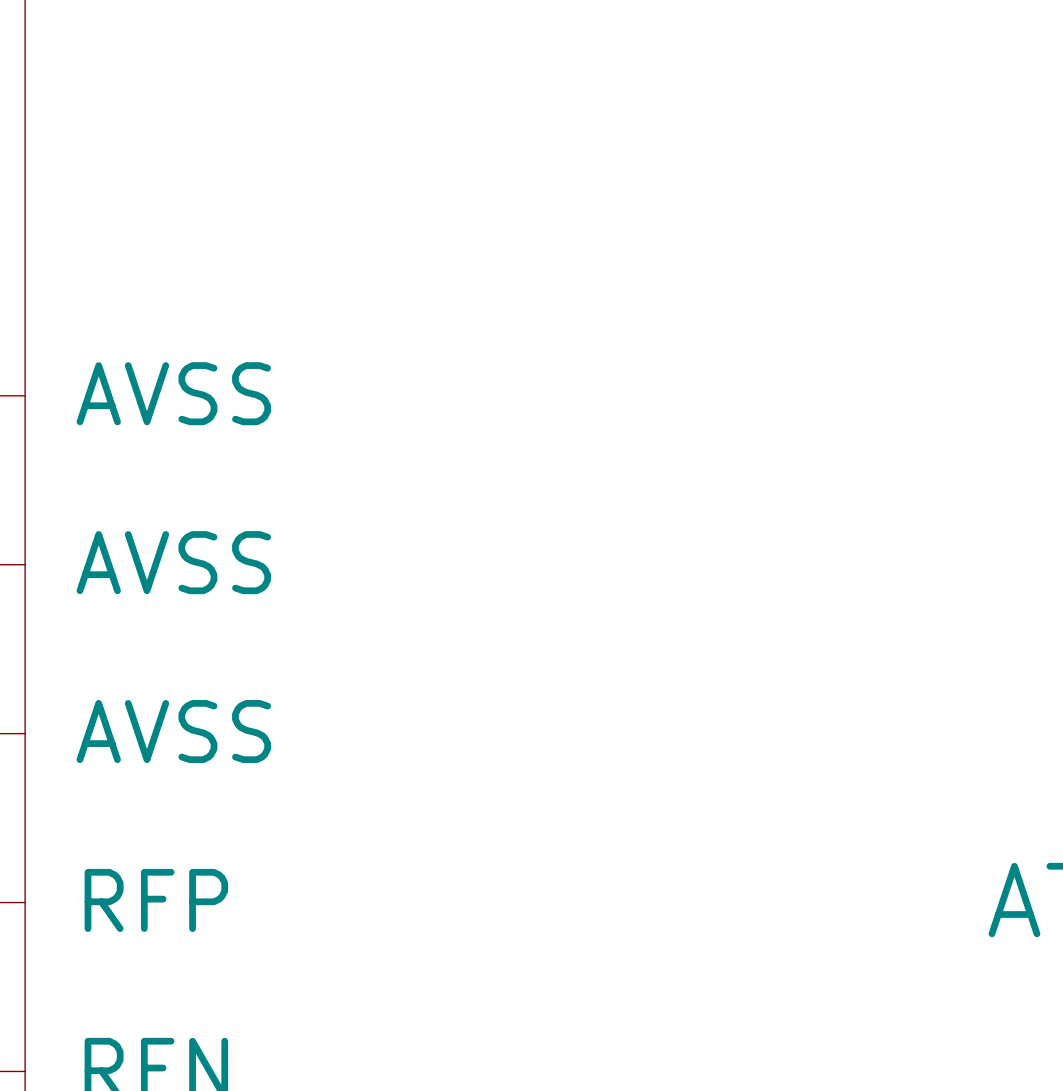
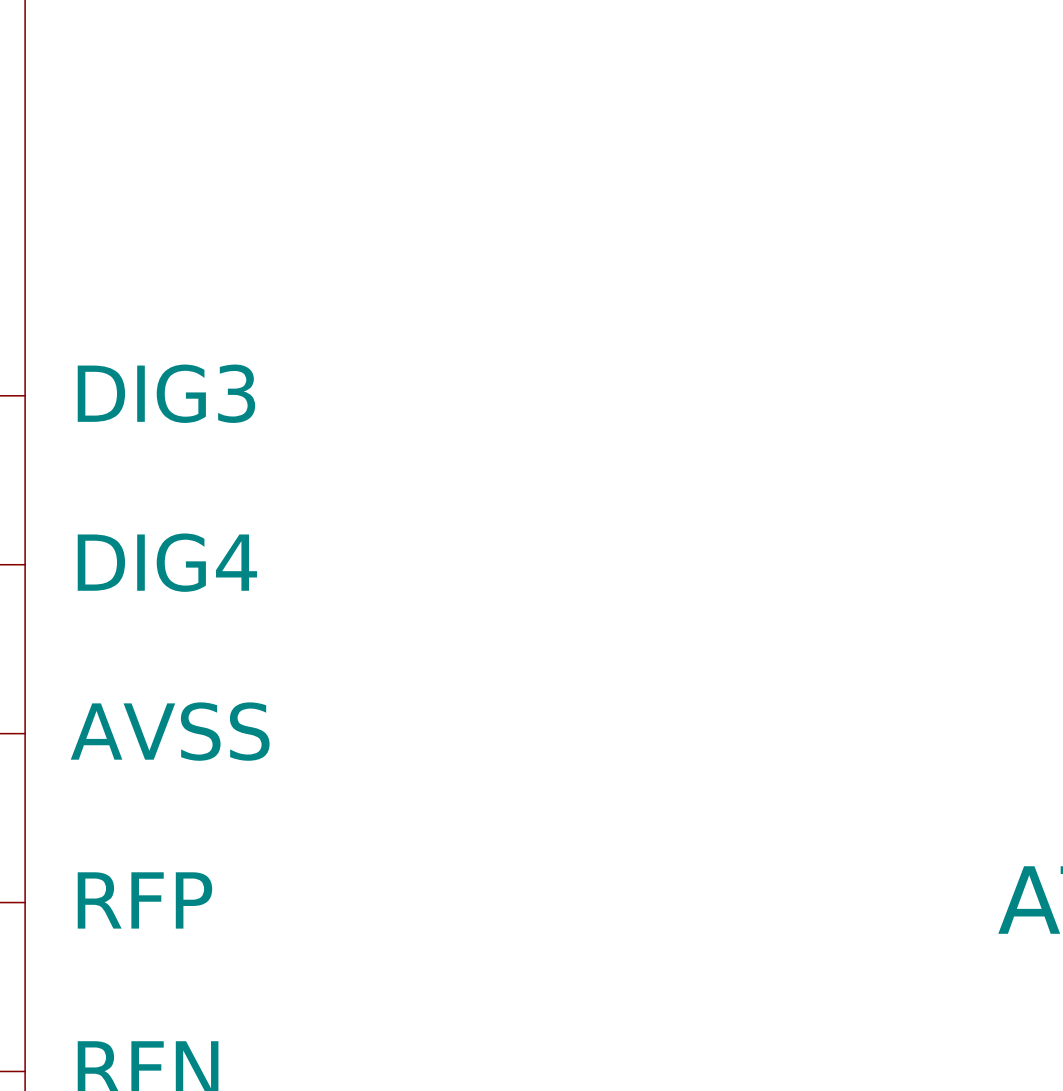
part pin name: AVSS (173, 393) -> DIG3 (166, 393)
part pin name: AVSS (173, 562) -> DIG4 (167, 562)

